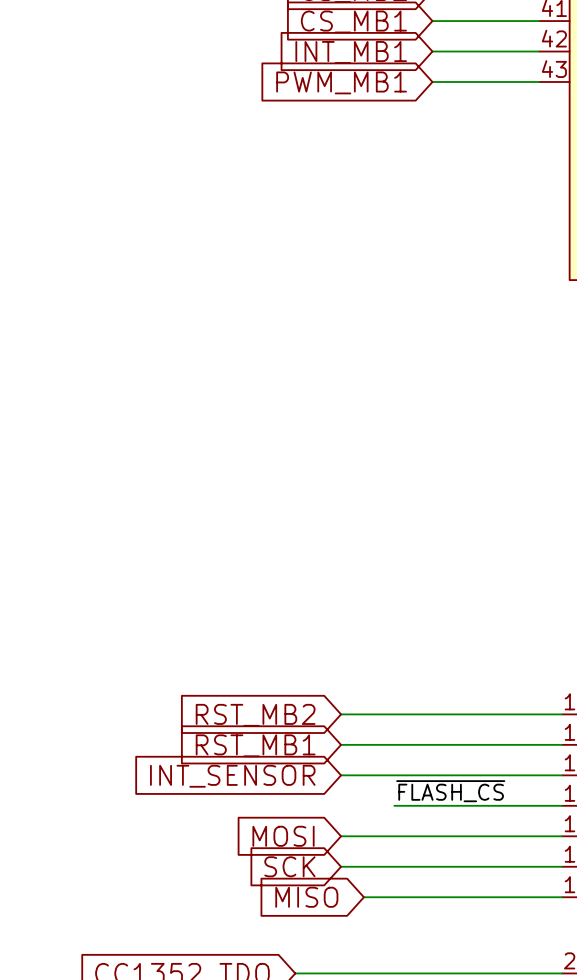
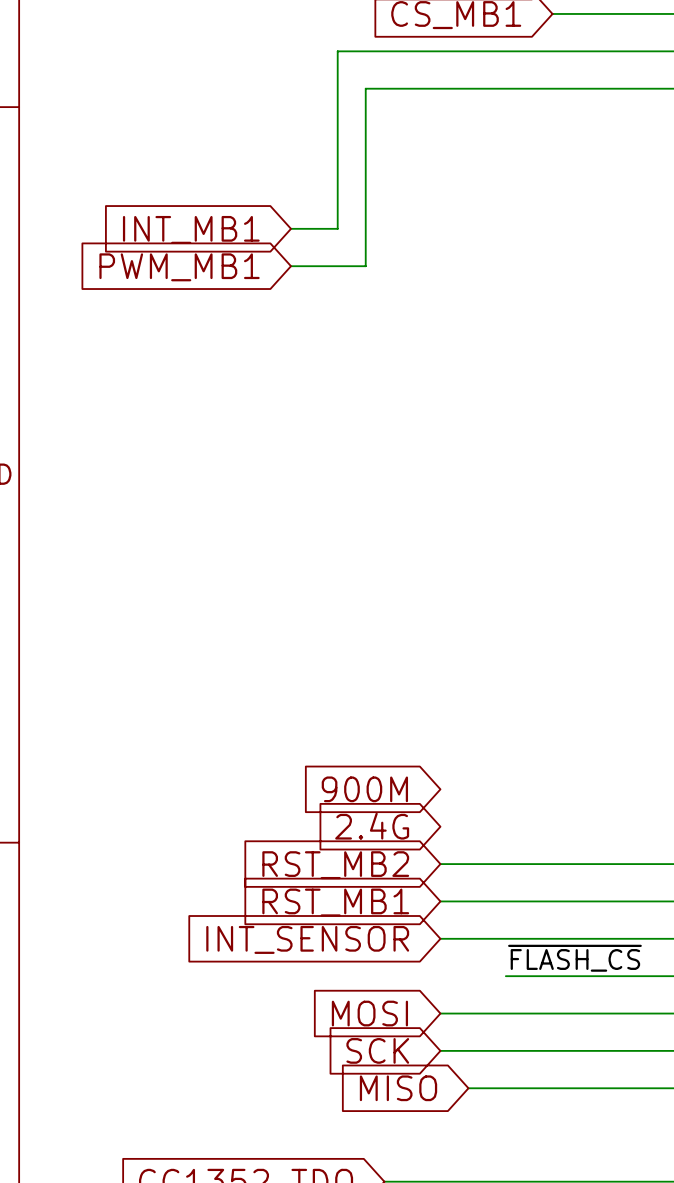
wire: none -> (552, 51) (337, 51) (337, 228) (291, 228)
global label position: INT_MB1 (351, 52) -> INT_MB1 (191, 229)
global label position: PWM_MB1 (341, 82) -> PWM_MB1 (179, 267)
wire: none -> (552, 88) (365, 88) (365, 266) (291, 266)
global label: none -> 900M (364, 789)
global label: none -> 2.4G (372, 826)

